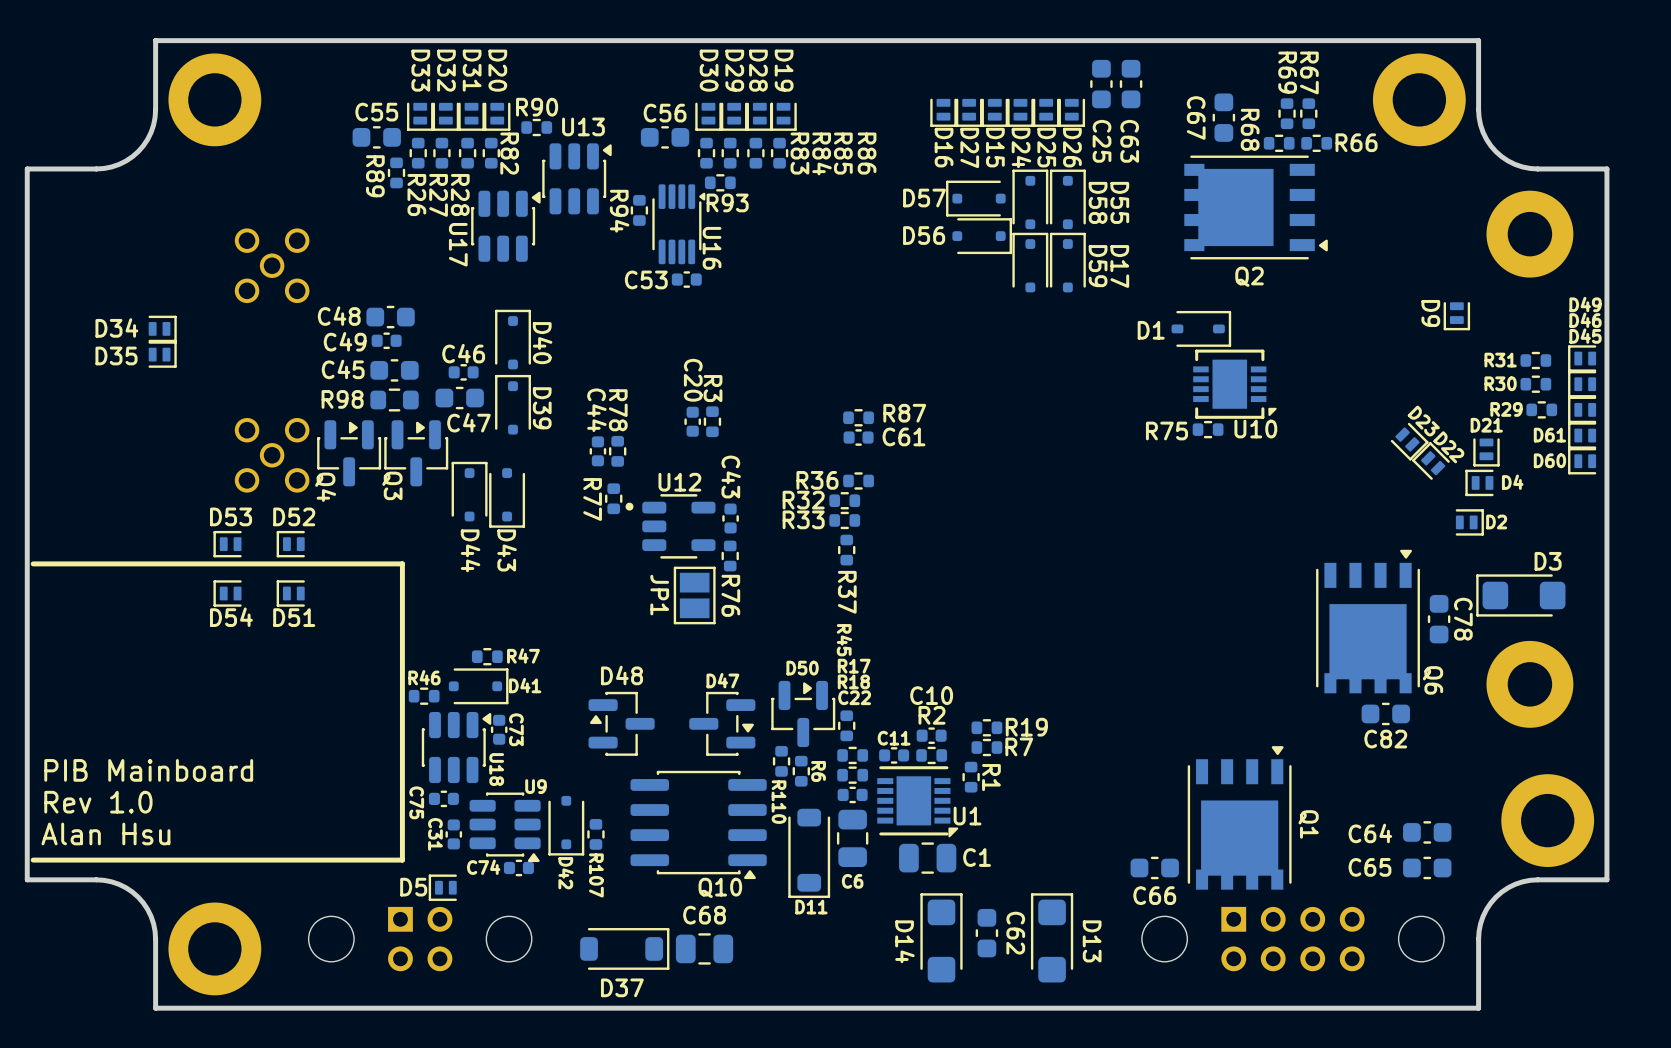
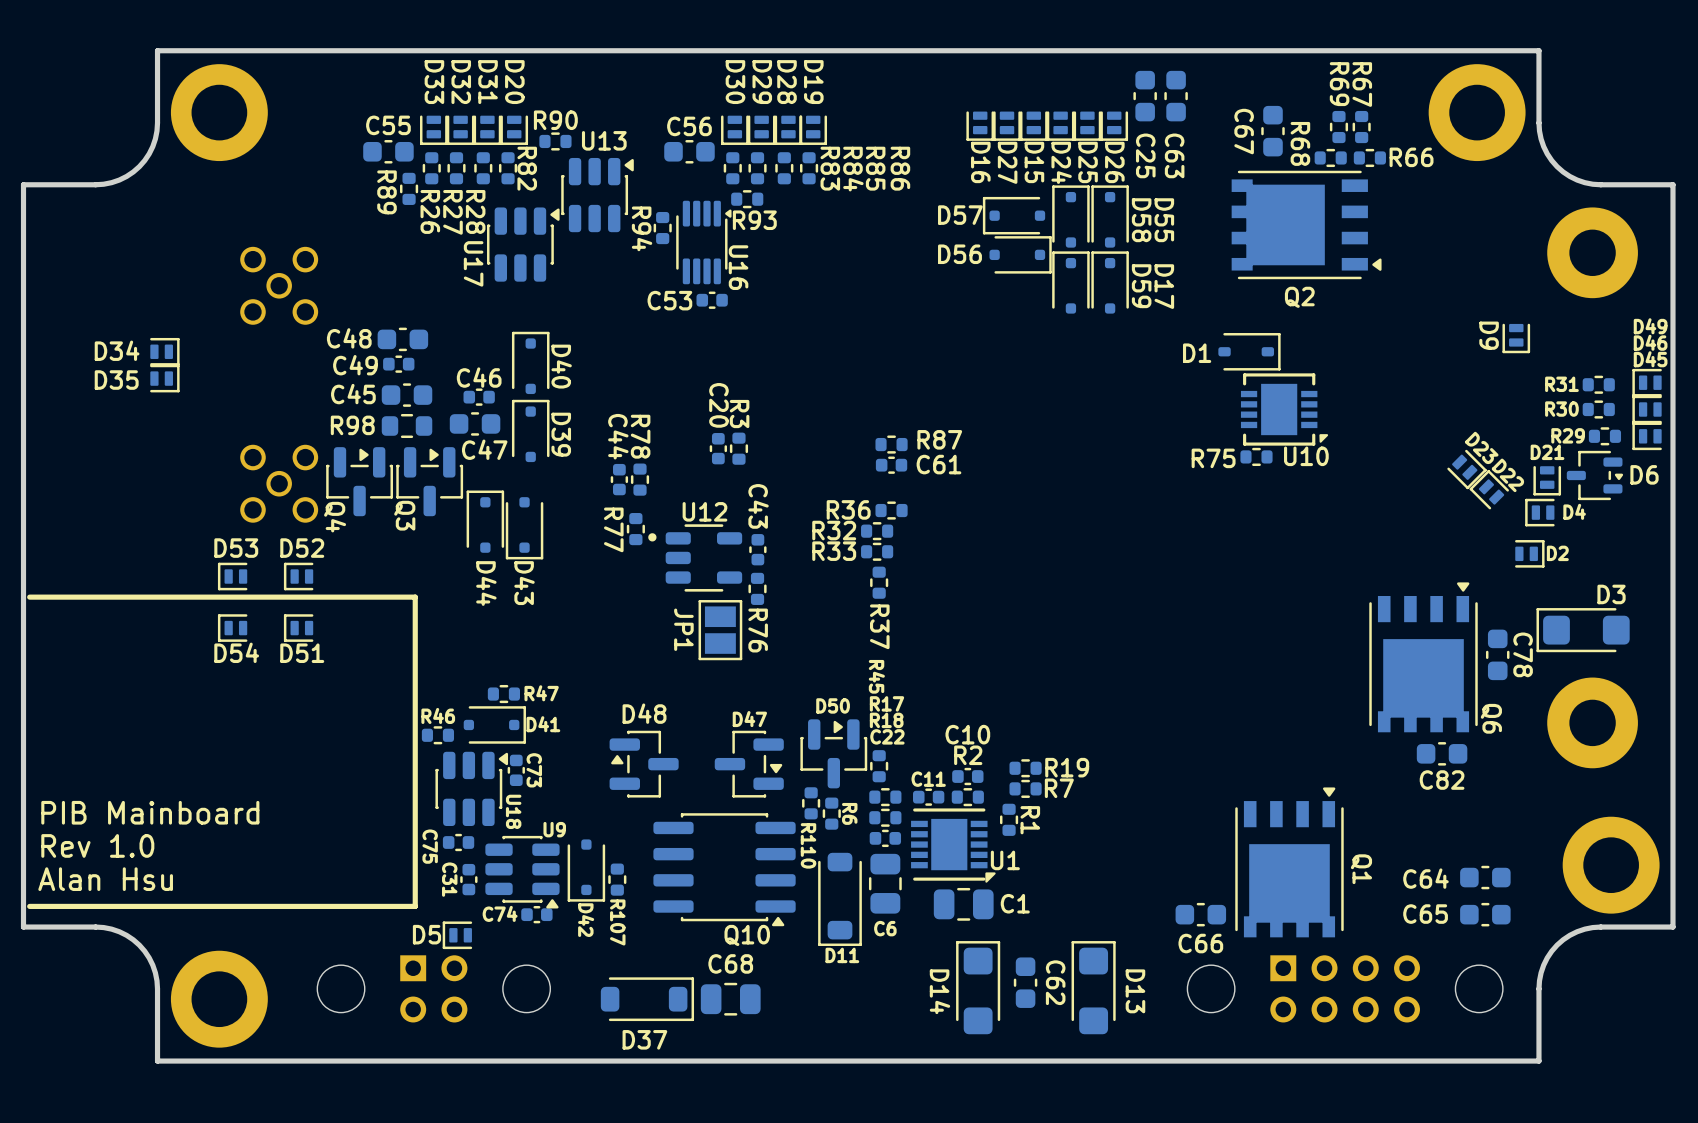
D61: (1582, 435) -> none
D6: none -> (1594, 475)
D60: (1582, 461) -> none

